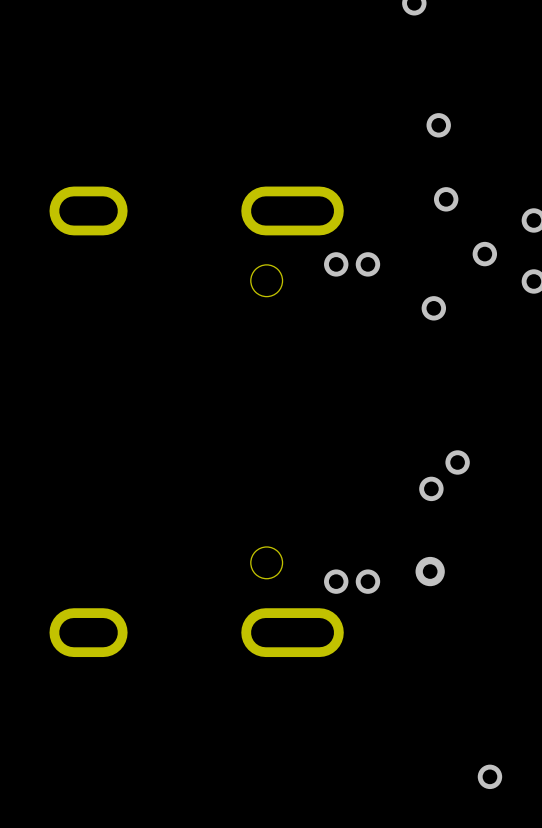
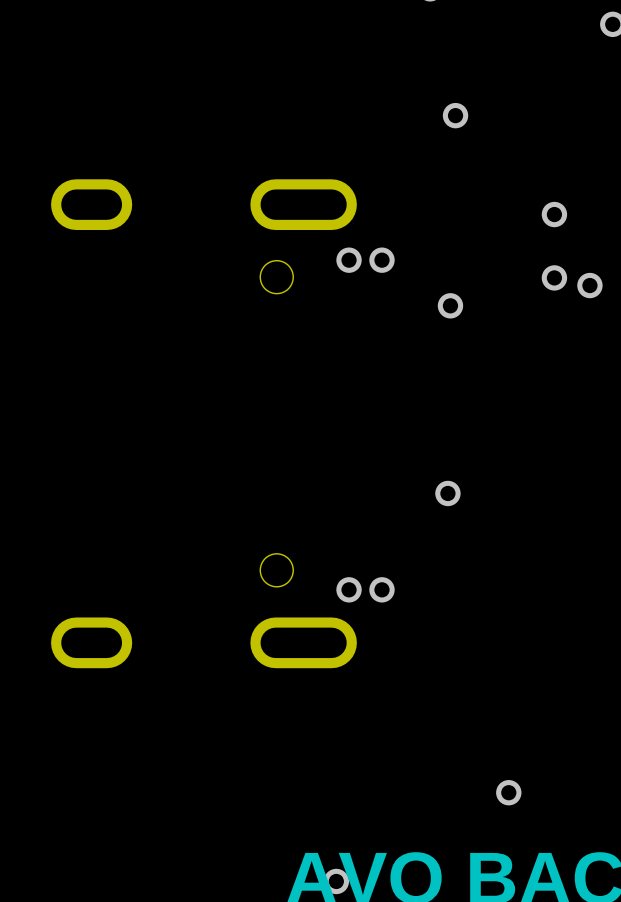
via: (446, 199) -> none
via: (484, 254) -> none
via: (457, 462) -> none
via: (430, 571) -> none

